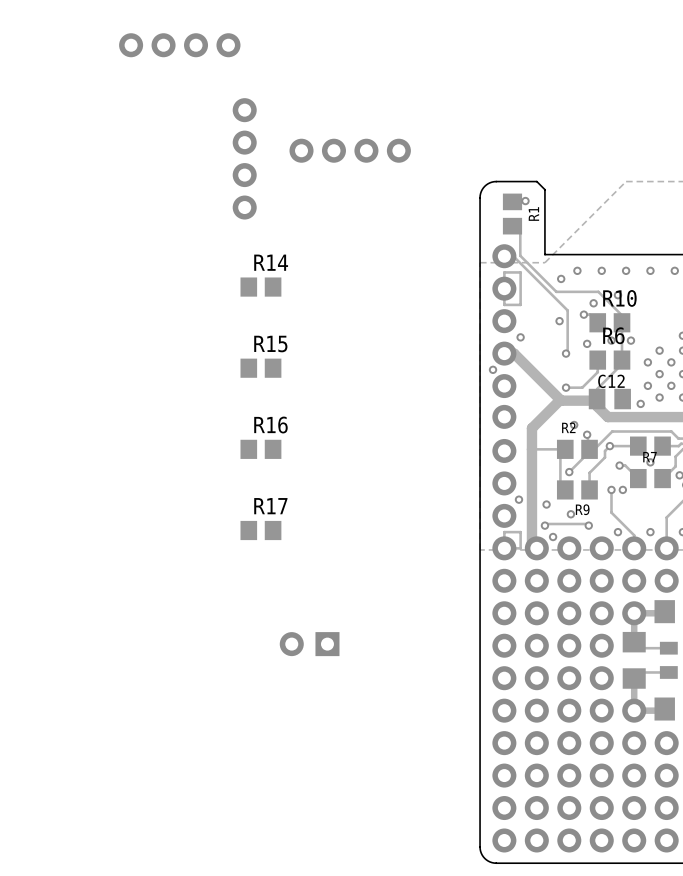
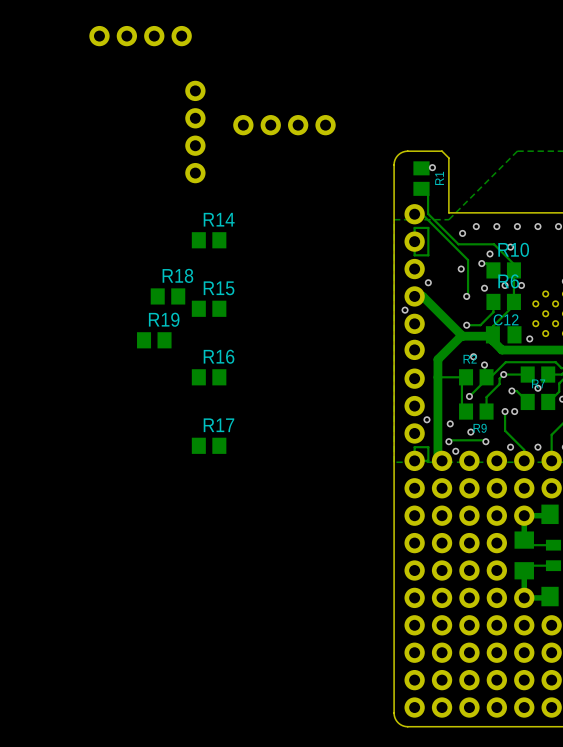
R18: none -> (167, 296)
R19: none -> (154, 340)
part: (309, 644) -> none

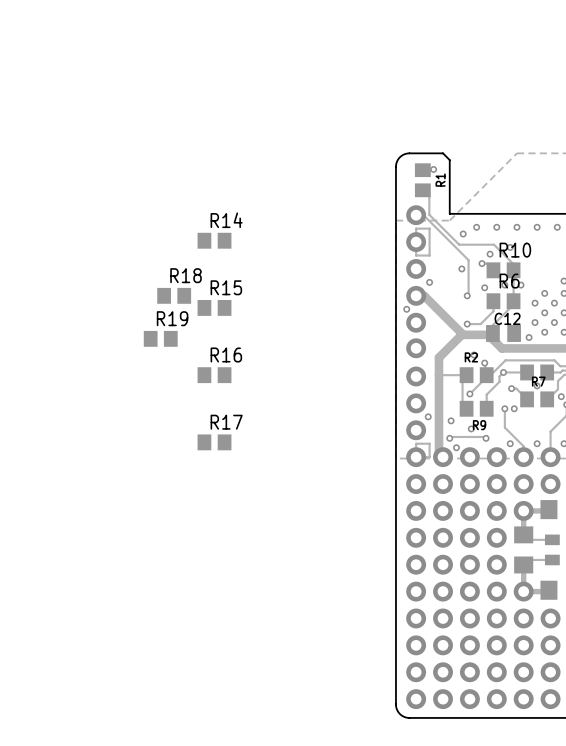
part: (140, 36) -> none
part: (284, 125) -> none
part: (195, 132) -> none

